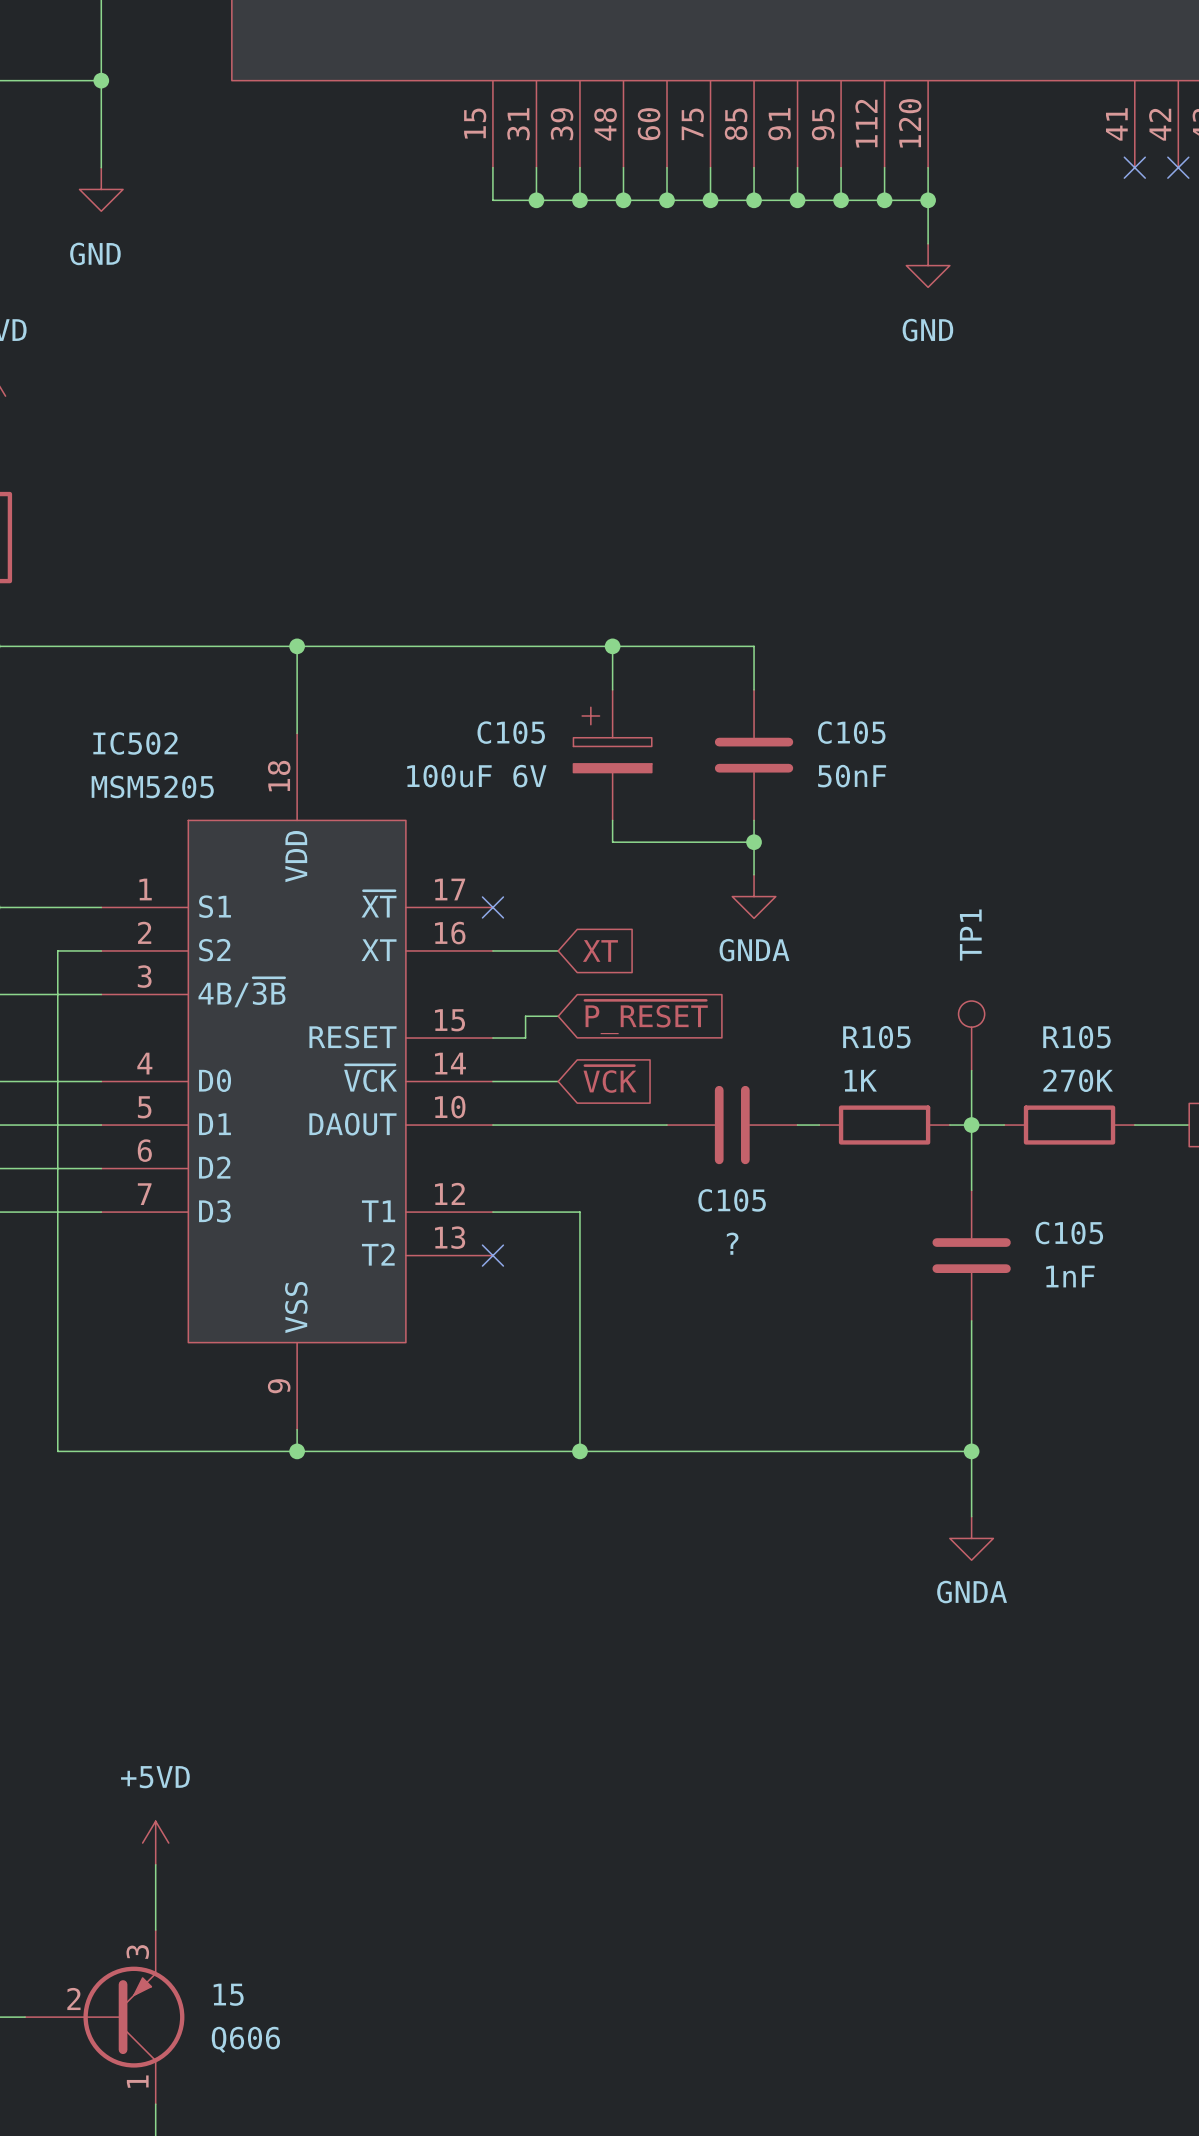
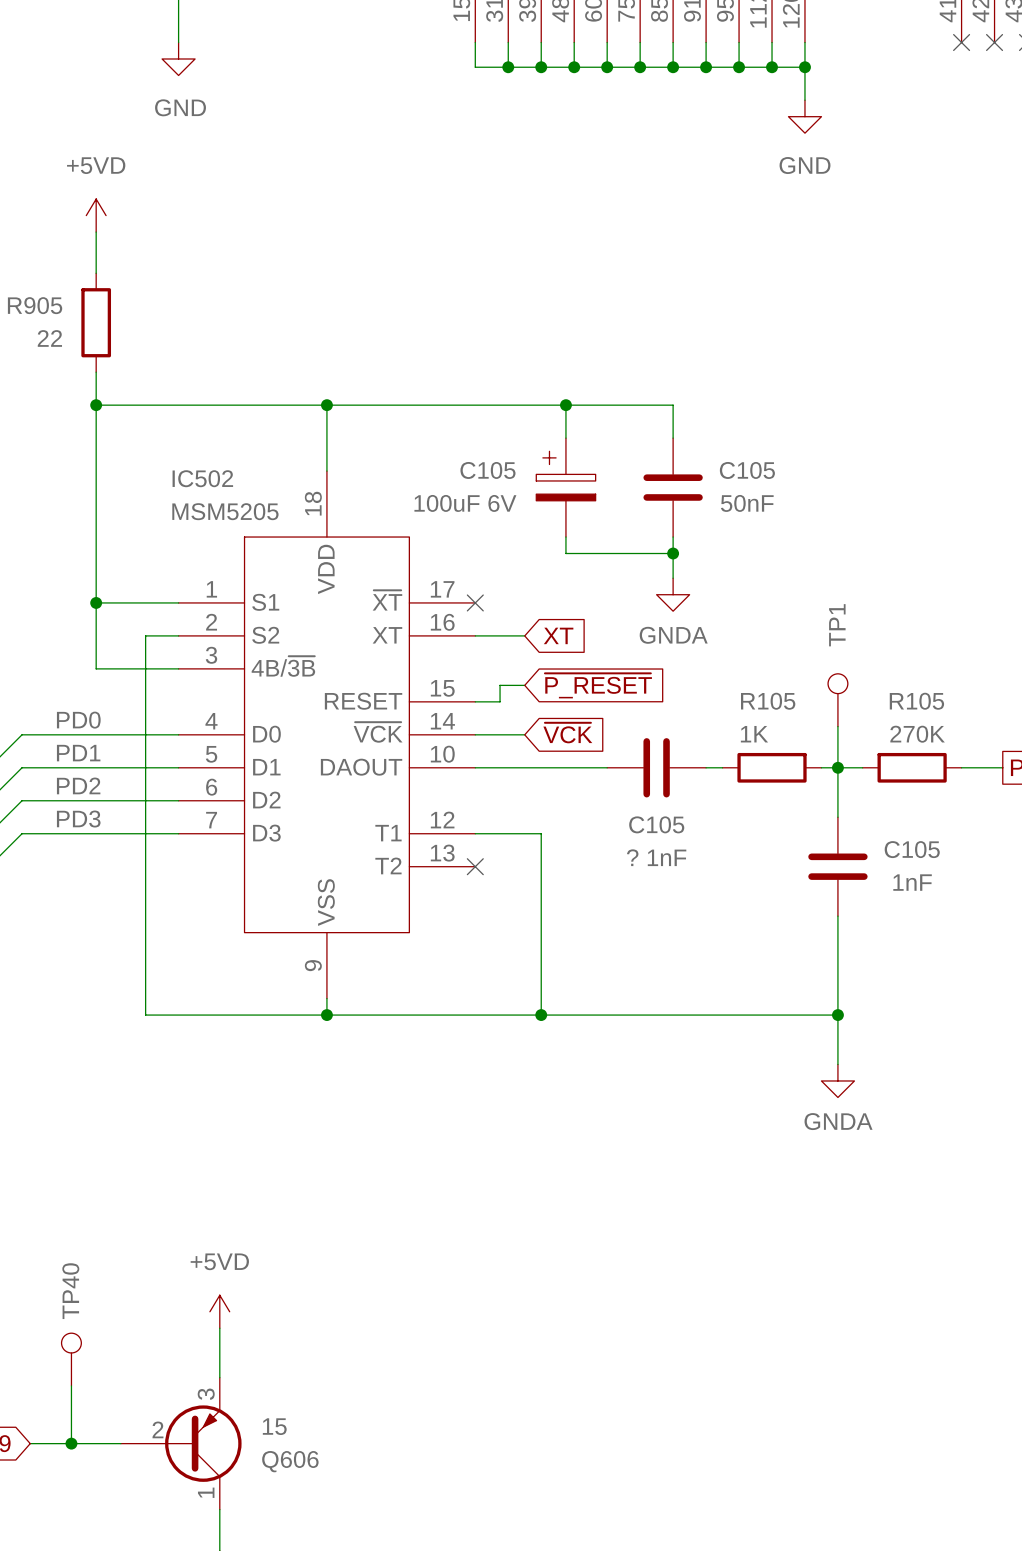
C105 value: ? (732, 1243) -> ? 1nF (656, 857)

